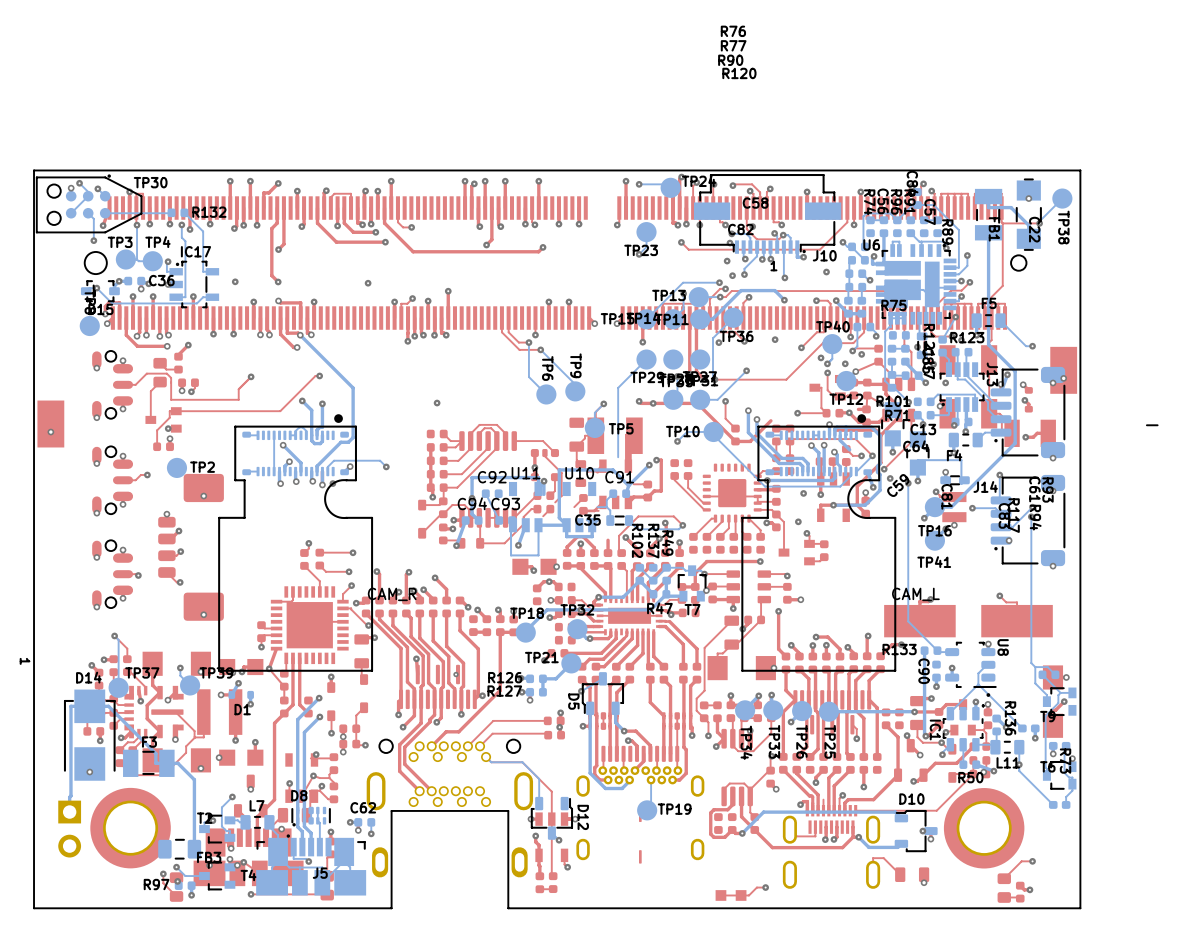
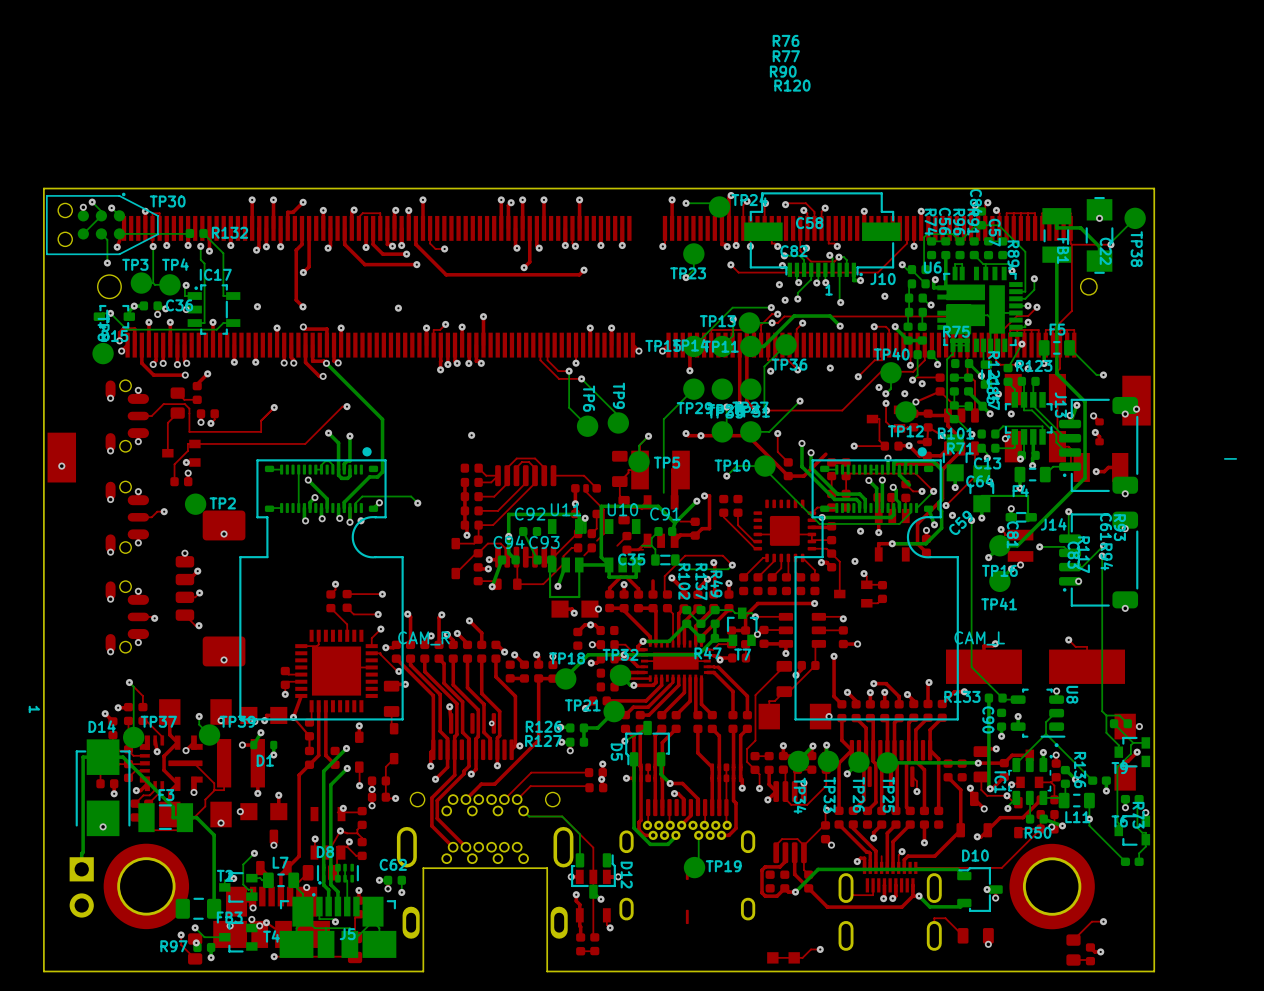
bottom track: none -> (969, 363) (981, 375)

